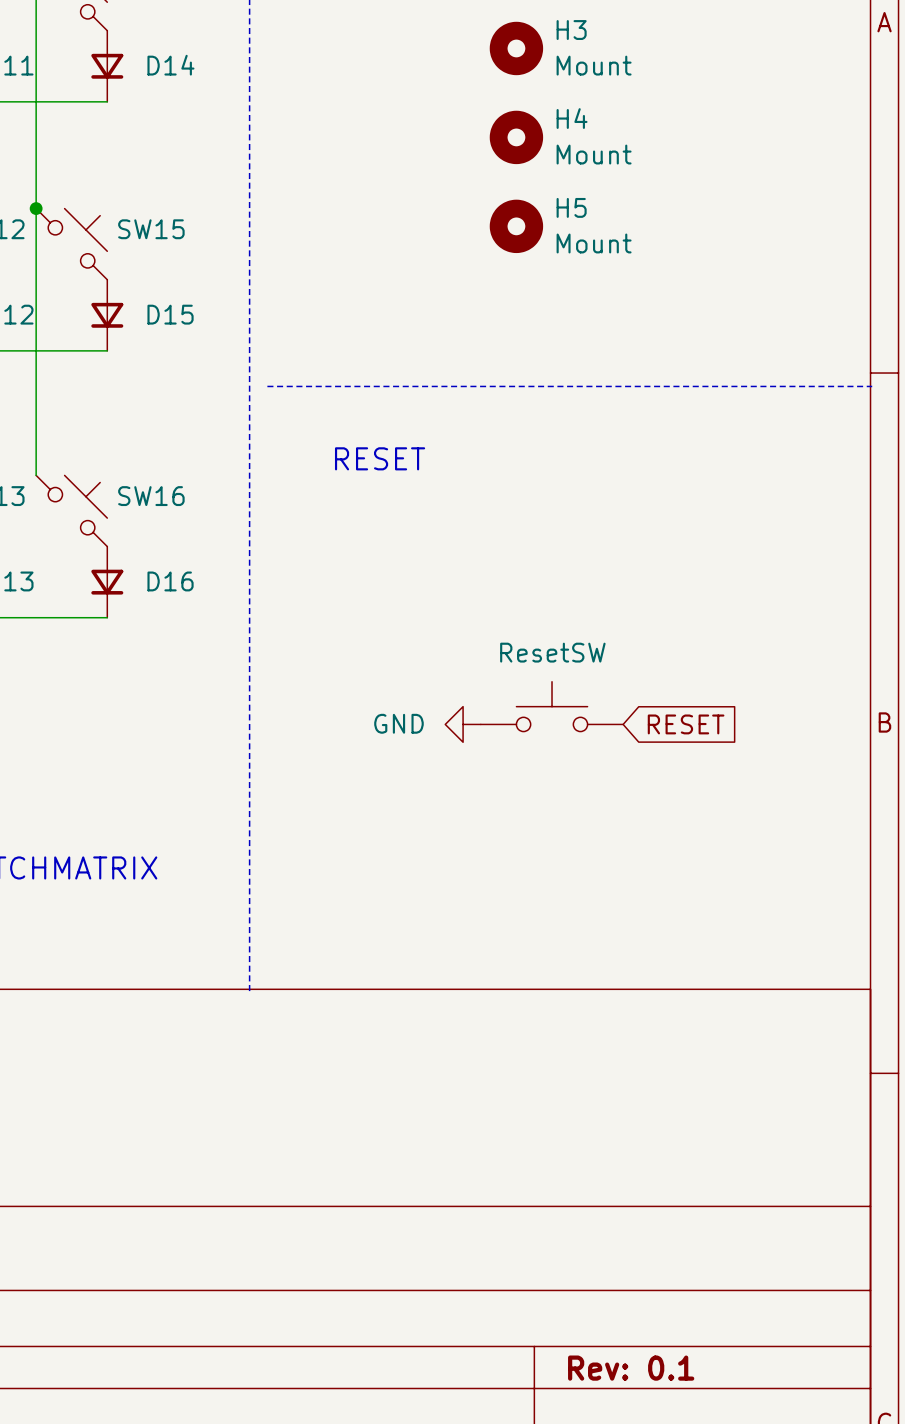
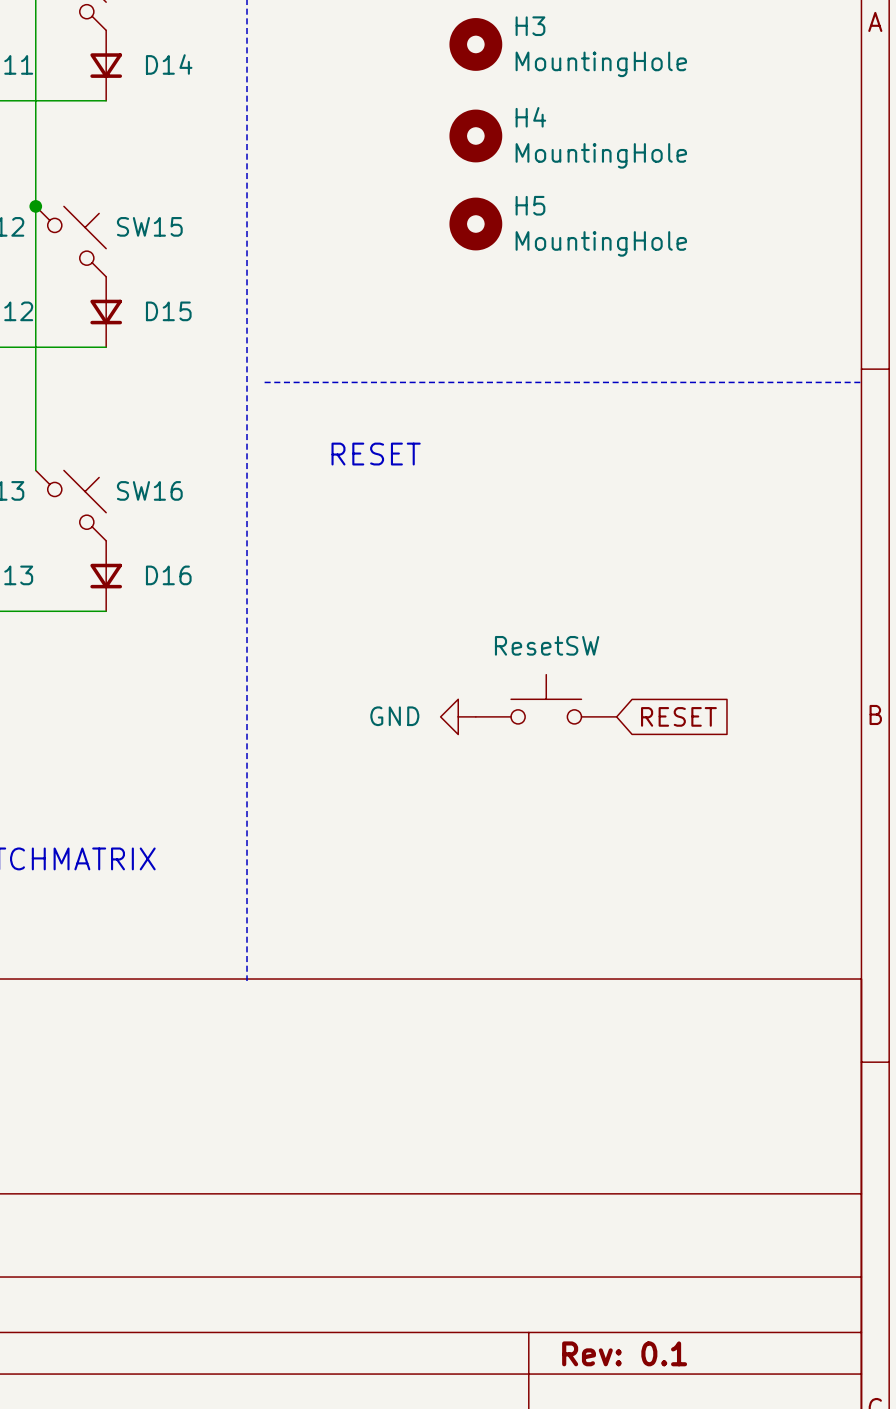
H3 position: (516, 48) -> (475, 44)
H3 value: Mount (594, 65) -> MountingHole (601, 64)
H4 position: (516, 137) -> (475, 135)
H4 value: Mount (594, 154) -> MountingHole (601, 155)
H5 position: (516, 226) -> (475, 224)
H5 value: Mount (594, 243) -> MountingHole (601, 243)

